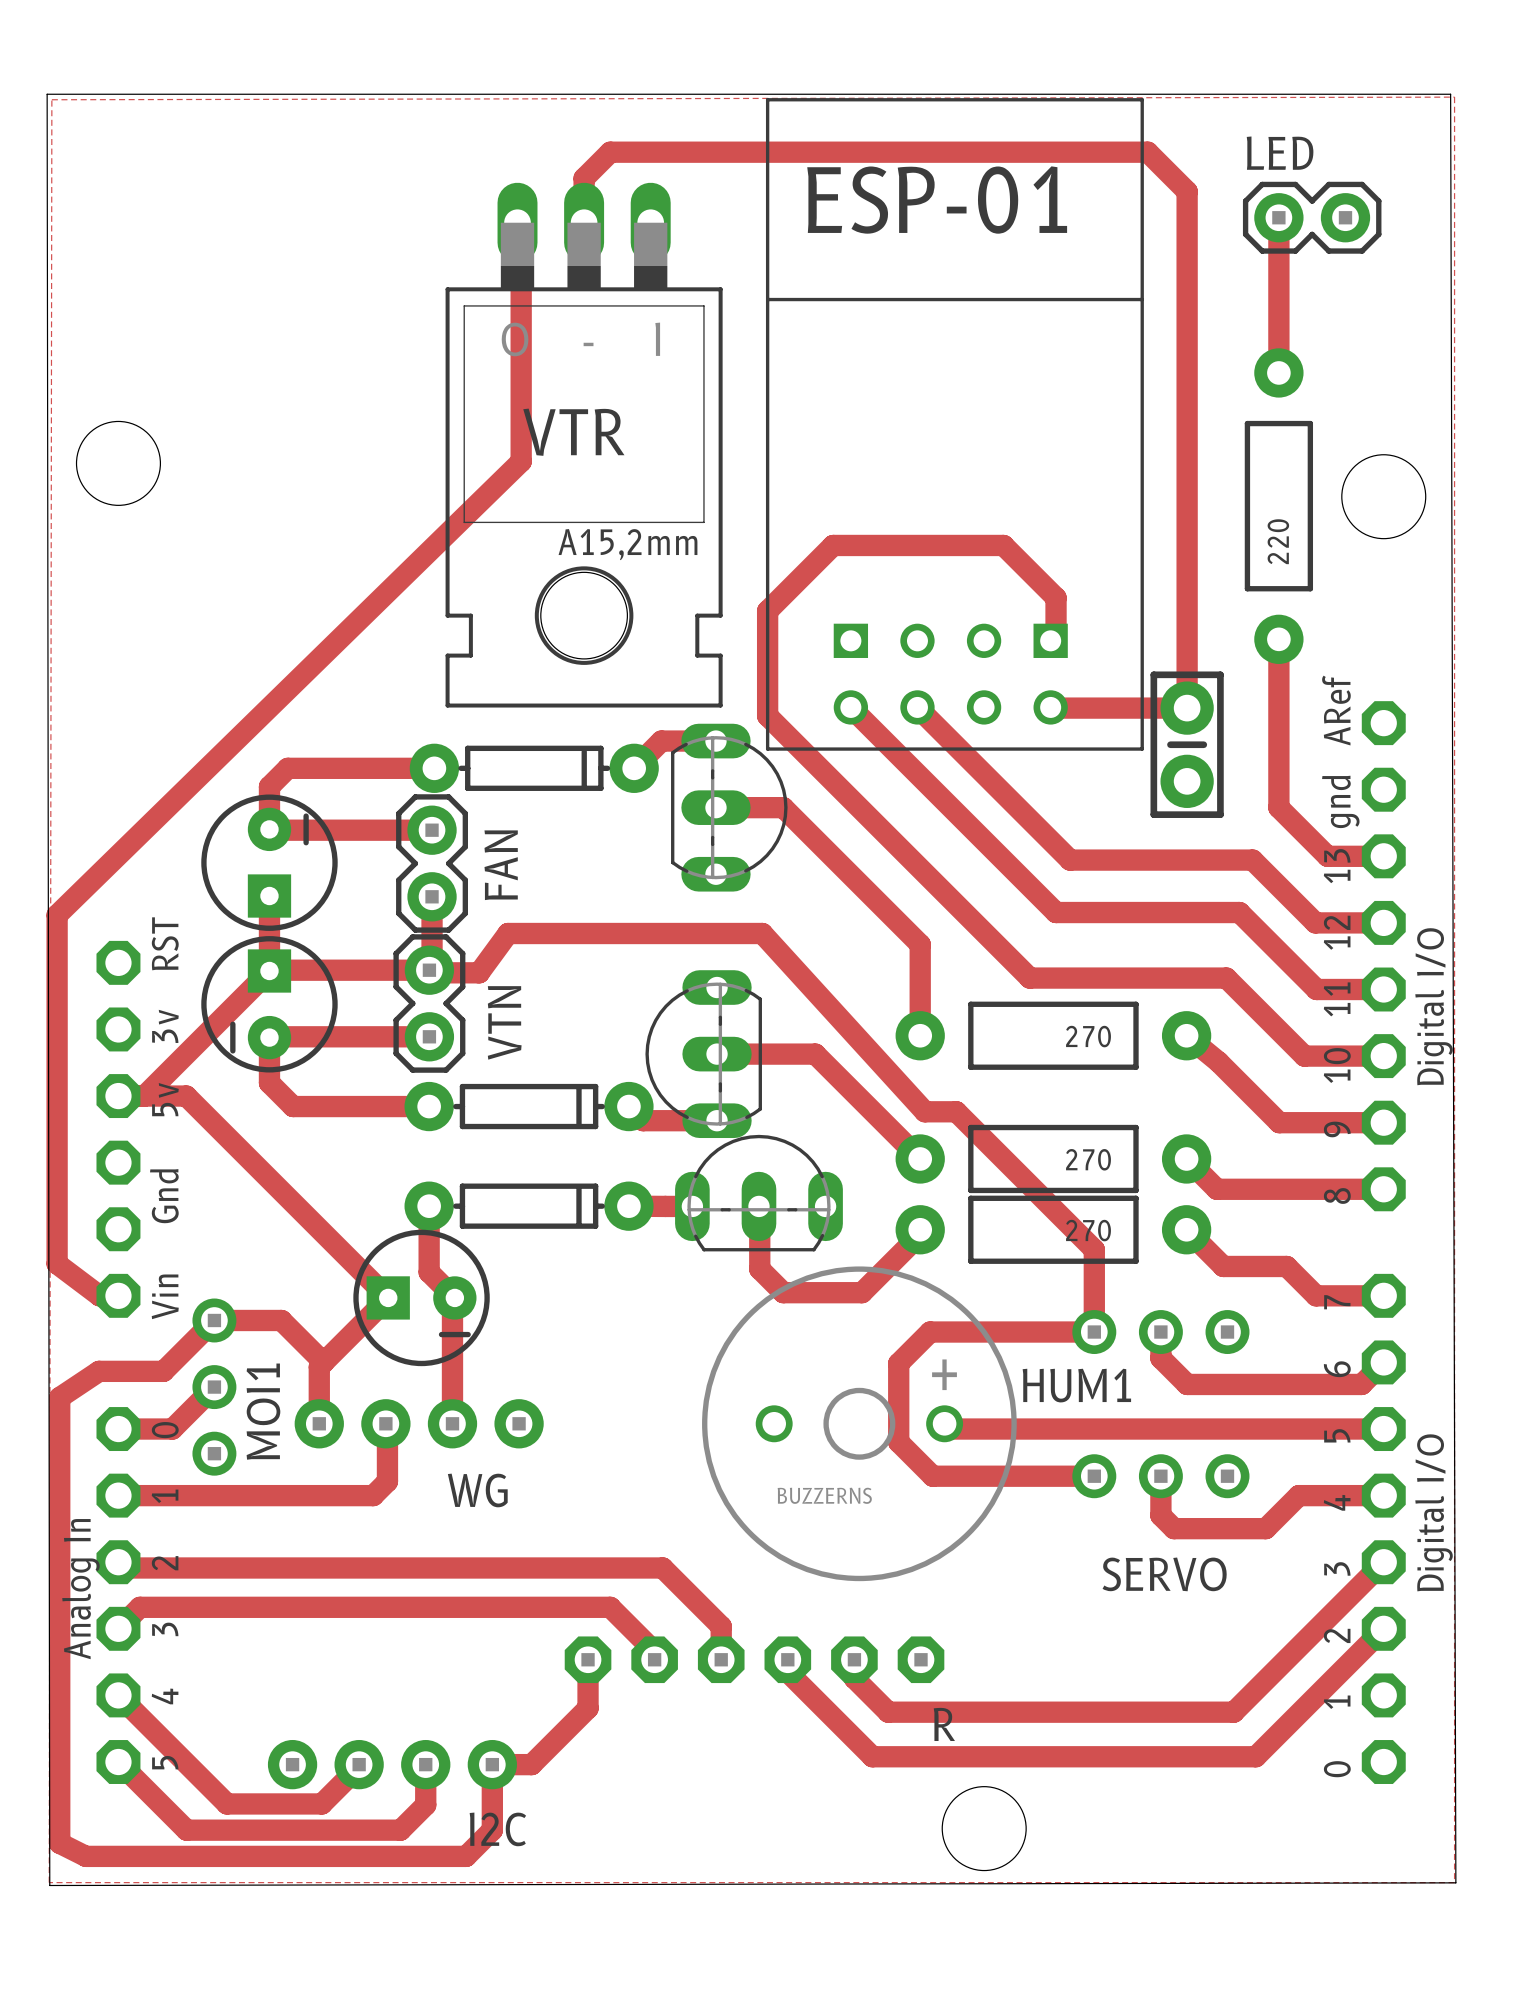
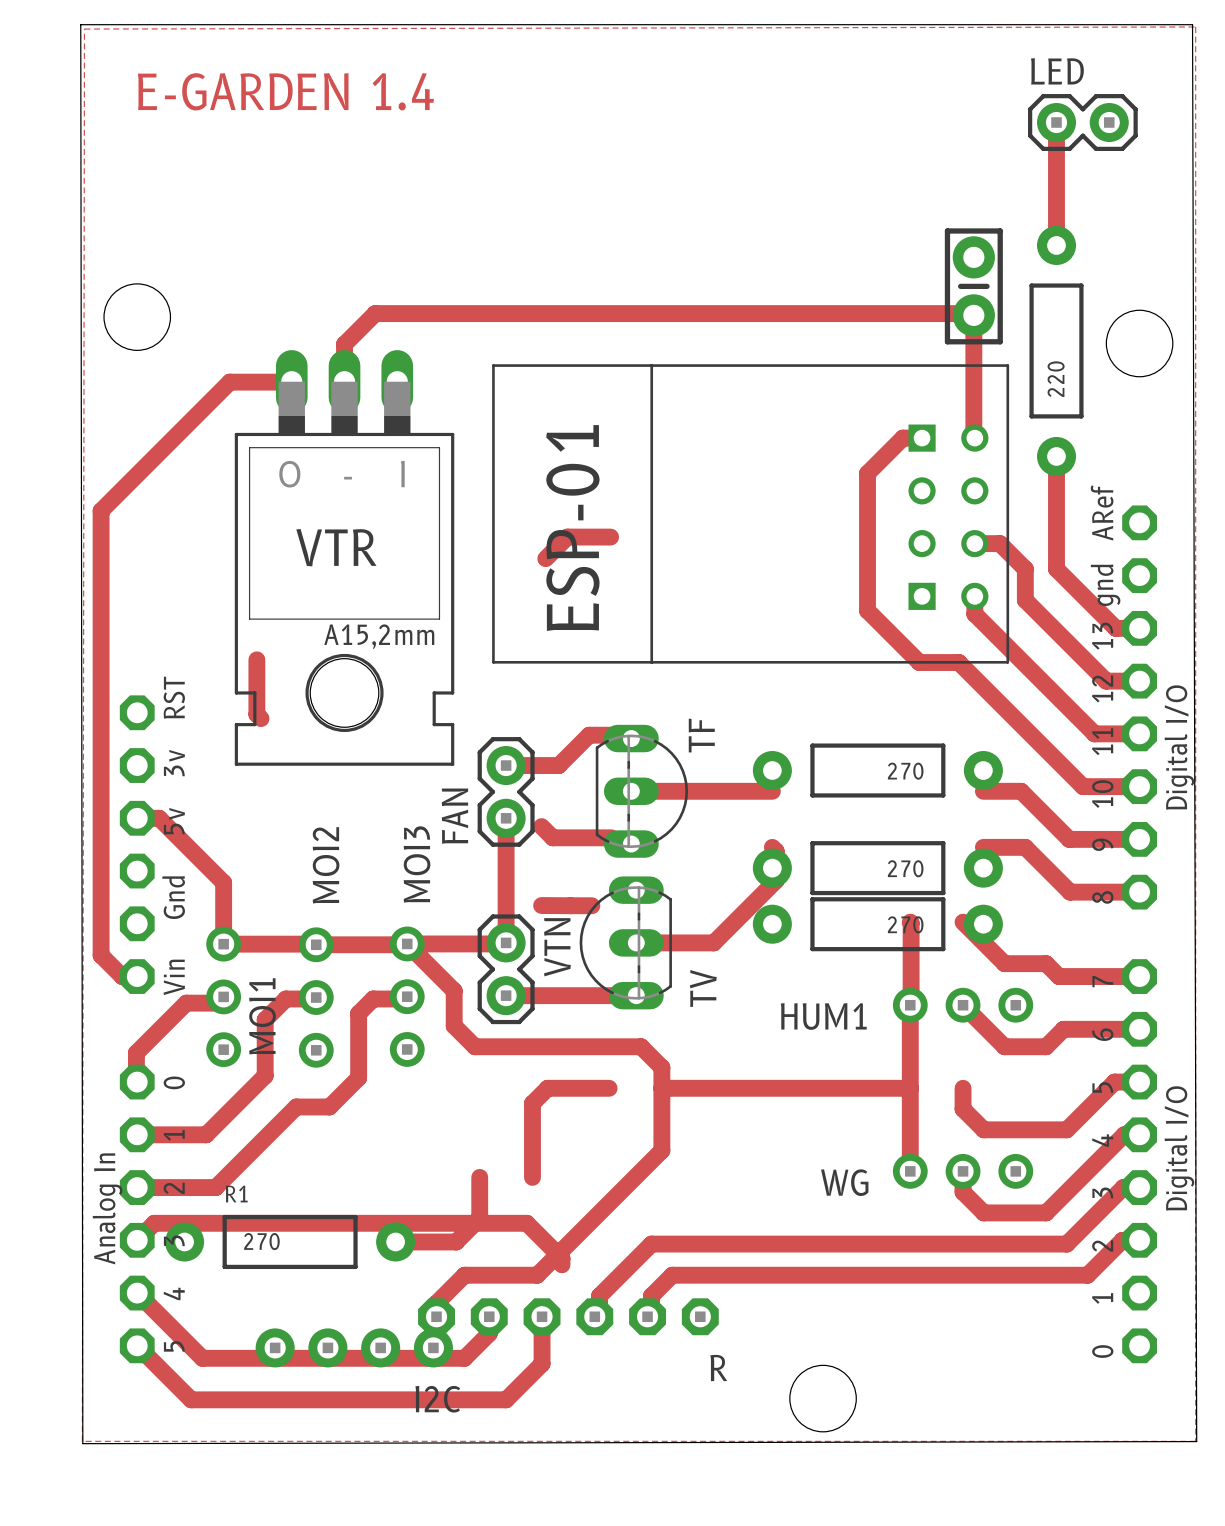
text: none -> E-GARDEN 1.4 (285, 91)
top track: (517, 222) (521, 226) (521, 461) (57, 915) (57, 1263) (99, 1295) -> (291, 381) (229, 382) (101, 510) (101, 955) (122, 976)
top track: (584, 222) (584, 178) (610, 152) (1147, 152) (1187, 191) (1187, 708) (1050, 707) -> none
part rotation: 0° (954, 424) -> 90° counterclockwise (750, 513)
VTR position: (584, 445) -> (344, 557)
top track: none -> (344, 381) (344, 344) (375, 313) (972, 313) (973, 315) (974, 438)
top track: (1050, 640) (1056, 635) (1056, 597) (1003, 545) (833, 545) (767, 611) (767, 715) (1029, 978) (1226, 978) (1304, 1056) (1312, 1056) -> (922, 438) (902, 438) (867, 473) (867, 610) (919, 662) (958, 662) (1083, 786)
top track: (850, 707) (1055, 912) (1239, 912) (1316, 989) (1327, 989) -> (974, 596) (974, 614) (1094, 733)
top track: (917, 707) (1070, 860) (1252, 860) (1315, 922) (1341, 922) -> (974, 543) (999, 543) (1025, 569) (1025, 600) (1106, 681)
part position: (1187, 744) -> (973, 286)
top track: (434, 768) (287, 768) (269, 786) (269, 829) (432, 830) (434, 827) -> none
part: (534, 768) -> none
top track: (1278, 781) (1278, 807) (1327, 856) (1353, 856) -> (1056, 569) (1115, 628)
top track: (715, 807) (783, 807) (920, 944) (920, 1035) -> none
part: (729, 807) -> none
part: (269, 862) -> none
FAN position: (432, 863) -> (506, 791)
FAN name position: FAN (501, 865) -> FAN (454, 816)
top track: (432, 896) (432, 967) (429, 970) (270, 970) (144, 1096) -> none
top track: (433, 972) (479, 972) (508, 933) (762, 933) (924, 1111) (956, 1111) (1094, 1249) (1094, 1332) (930, 1332) (898, 1363) (898, 1442) (932, 1476) (1094, 1476) -> none
top track: none -> (631, 738) (638, 735) (589, 735) (558, 765) (506, 765)
VTN position: (429, 1003) -> (506, 969)
part: (269, 1004) -> none
VTN name position: VTN (504, 1022) -> VTN (557, 947)
top track: (1186, 1035) (1218, 1061) (1279, 1122) (1295, 1122) -> (983, 791) (1021, 791) (1069, 839)
top track: (429, 1036) (269, 1037) (269, 1082) (293, 1106) (429, 1106) -> none
part: (703, 1054) -> none
top track: (717, 1054) (815, 1054) (920, 1158) -> none
top track: none -> (631, 791) (772, 791)
TF: none -> (641, 791)
top track: (146, 1096) (186, 1096) (388, 1297) (319, 1366) (319, 1423) -> (159, 818) (223, 882) (223, 944) (407, 943)
top track: none -> (506, 818) (506, 942) (407, 943)
part: (529, 1106) -> none
top track: none -> (772, 847) (776, 851) (776, 880) (713, 942) (636, 942)
top track: (1186, 1158) (1216, 1189) (1296, 1189) -> (983, 847) (1025, 847) (1070, 892)
part: (758, 1193) -> none
top track: (429, 1206) (429, 1272) (454, 1297) (452, 1300) (452, 1423) -> none
part: (529, 1206) -> none
top track: (758, 1206) (759, 1269) (783, 1292) (862, 1292) (920, 1234) (920, 1229) -> none
top track: none -> (910, 922) (910, 1171)
top track: (1186, 1229) (1223, 1266) (1286, 1266) (1316, 1295) -> (963, 922) (1004, 963) (1046, 963) (1058, 976) (1085, 976)
TV: none -> (625, 942)
top track: none -> (407, 943) (454, 990) (454, 1025) (474, 1046) (641, 1046) (661, 1067) (661, 1150) (537, 1275) (464, 1275) (436, 1303) (436, 1316)
part: (421, 1297) -> none
top track: none -> (506, 995) (636, 995)
MOI3: none -> (407, 996)
MOI2: none -> (316, 997)
top track: (1160, 1332) (1160, 1358) (1187, 1384) (1213, 1384) -> (963, 1005) (1004, 1046)
top track: (323, 1362) (281, 1320) (214, 1320) (163, 1371) (99, 1371) (59, 1397) (59, 1843) (85, 1856) (466, 1856) (492, 1830) (492, 1764) (531, 1764) (588, 1708) (588, 1659) -> none
top track: (1383, 1362) (1361, 1384) (1265, 1384) -> (1139, 1029) (1063, 1029) (1046, 1046)
HUM1 name position: HUM1 (1076, 1385) -> HUM1 (823, 1016)
top track: (214, 1387) (172, 1429) (118, 1429) -> (223, 996) (217, 1003) (186, 1003) (136, 1052) (137, 1082)
MOI1 position: (214, 1387) -> (223, 996)
top track: (385, 1423) (387, 1425) (387, 1481) (373, 1495) (205, 1495) -> (316, 997) (285, 998) (265, 1019) (265, 1075) (206, 1134)
WG: (419, 1423) -> none
part: BUZZERNS (859, 1423) -> none
top track: (944, 1423) (944, 1429) (1352, 1429) -> (963, 1088) (963, 1109) (983, 1129) (1066, 1129) (1114, 1082)
top track: none -> (609, 1088) (547, 1088) (532, 1103) (532, 1177)
top track: none -> (661, 1088) (910, 1088)
top track: (1160, 1476) (1160, 1515) (1174, 1528) (1265, 1528) (1298, 1495) (1364, 1495) -> (963, 1171) (963, 1192) (983, 1212) (1046, 1212) (1124, 1134)
SERVO: (1160, 1476) -> none
WG: none -> (963, 1171)
top track: none -> (479, 1177) (479, 1218) (456, 1241) (395, 1241)
top track: (118, 1562) (124, 1567) (662, 1567) (721, 1626) (721, 1659) -> (137, 1187) (215, 1187) (296, 1106) (329, 1106) (358, 1077) (358, 1013) (373, 998) (404, 998) (407, 996)
top track: (1383, 1562) (1233, 1712) (888, 1712) (854, 1678) (854, 1659) -> (1139, 1187) (1123, 1187) (1066, 1244) (651, 1244) (599, 1295) (599, 1311) (594, 1316)
top track: (1383, 1628) (1255, 1756) (872, 1756) (787, 1672) (787, 1659) -> (1139, 1240) (1122, 1240) (1087, 1275) (672, 1275) (651, 1295) (651, 1312) (647, 1316)
R1: none -> 270 (290, 1241)
R position: (754, 1659) -> (568, 1316)
top track: (359, 1764) (321, 1803) (227, 1803) (200, 1777) -> (489, 1316) (489, 1333) (464, 1358) (202, 1358)
top track: (425, 1764) (425, 1805) (400, 1830) -> (542, 1316) (542, 1363) (506, 1399) (360, 1399)

